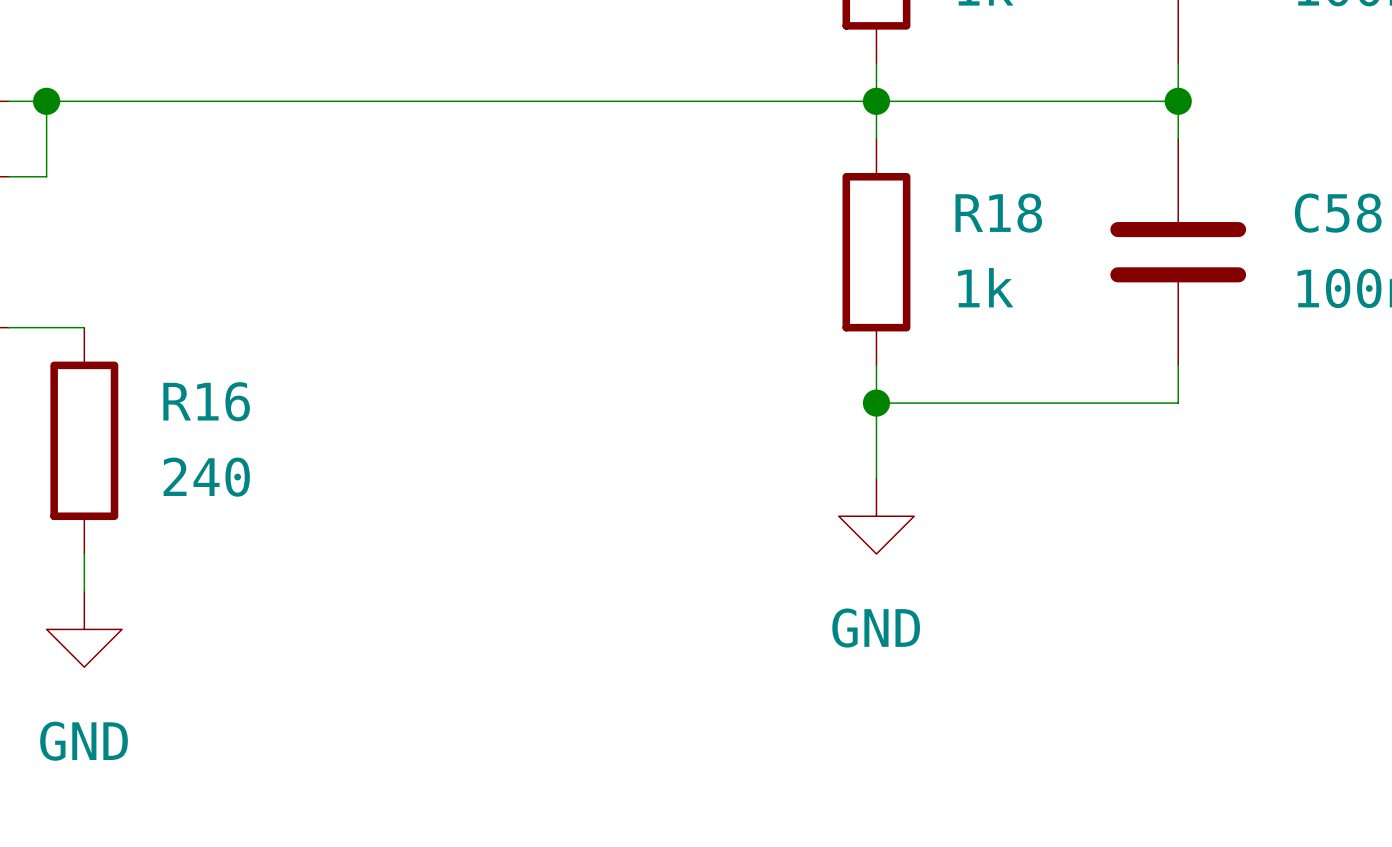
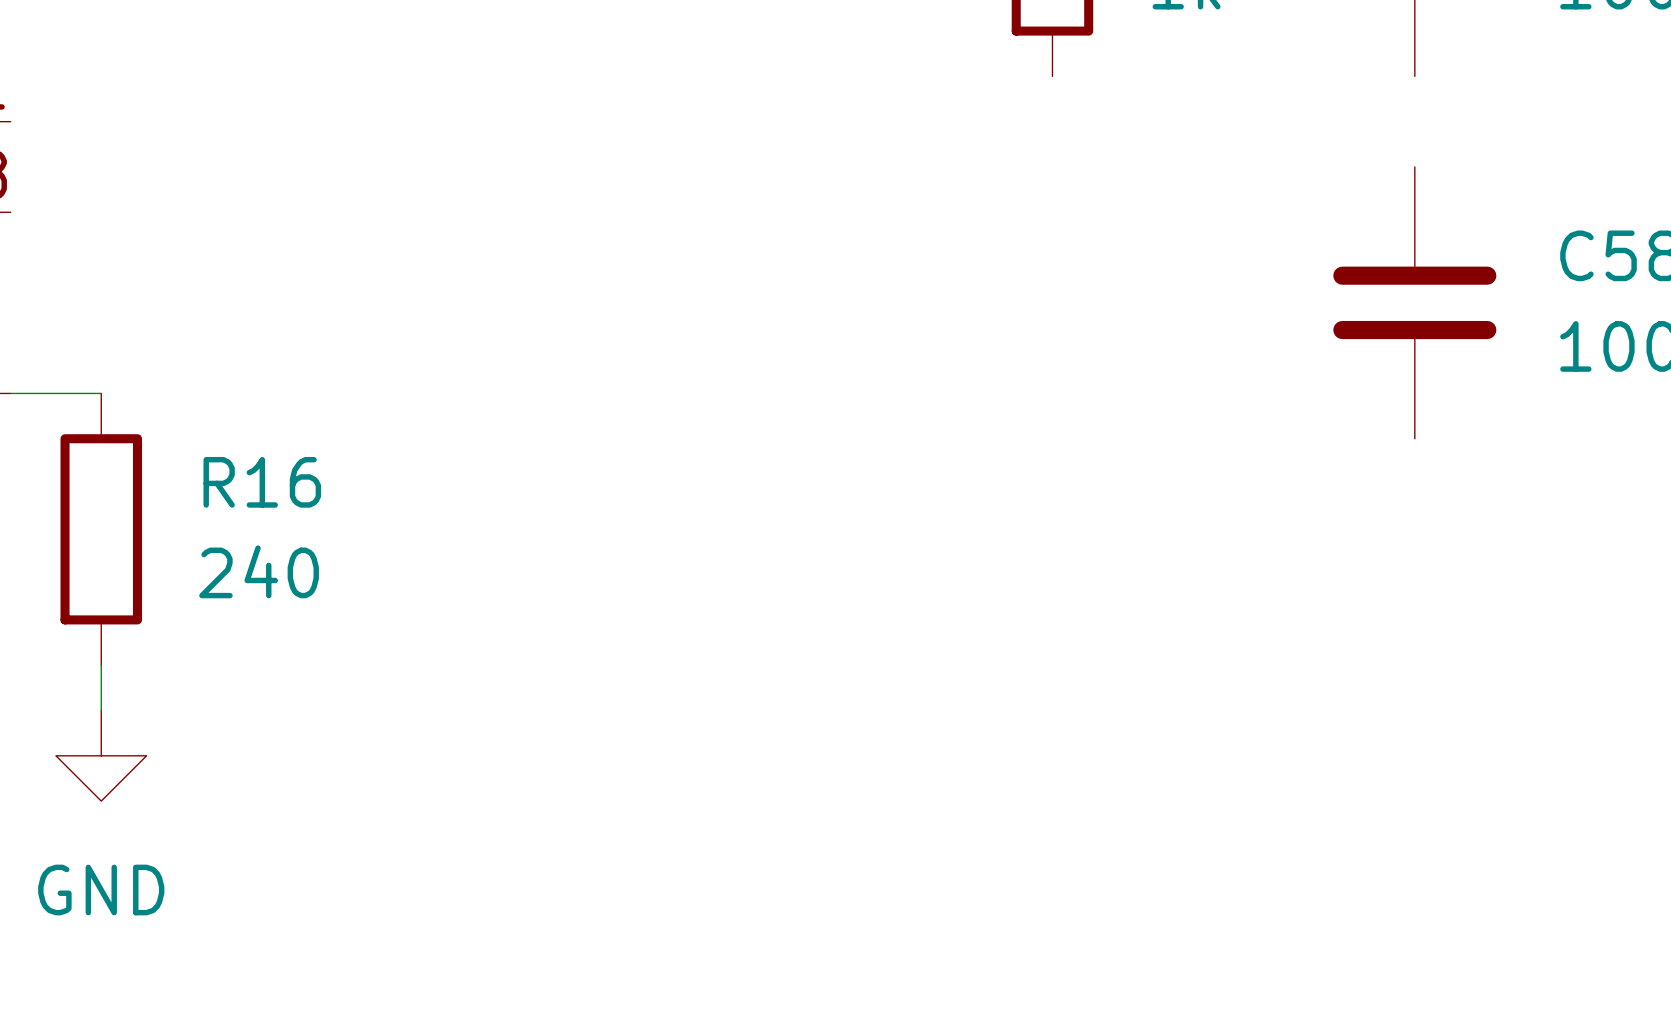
wire: (876, 63) (876, 139) -> none
wire: (1178, 63) (1178, 139) -> none
wire: (8, 101) (1178, 101) -> none
wire: (46, 101) (46, 176) (8, 176) -> none
junction: (46, 101) -> none
junction: (876, 101) -> none
junction: (1178, 101) -> none
R18: 1k (876, 252) -> none
wire: (876, 365) (876, 478) -> none
wire: (1178, 365) (1178, 403) (876, 403) -> none
junction: (876, 403) -> none
power symbol: GND (876, 516) -> none

